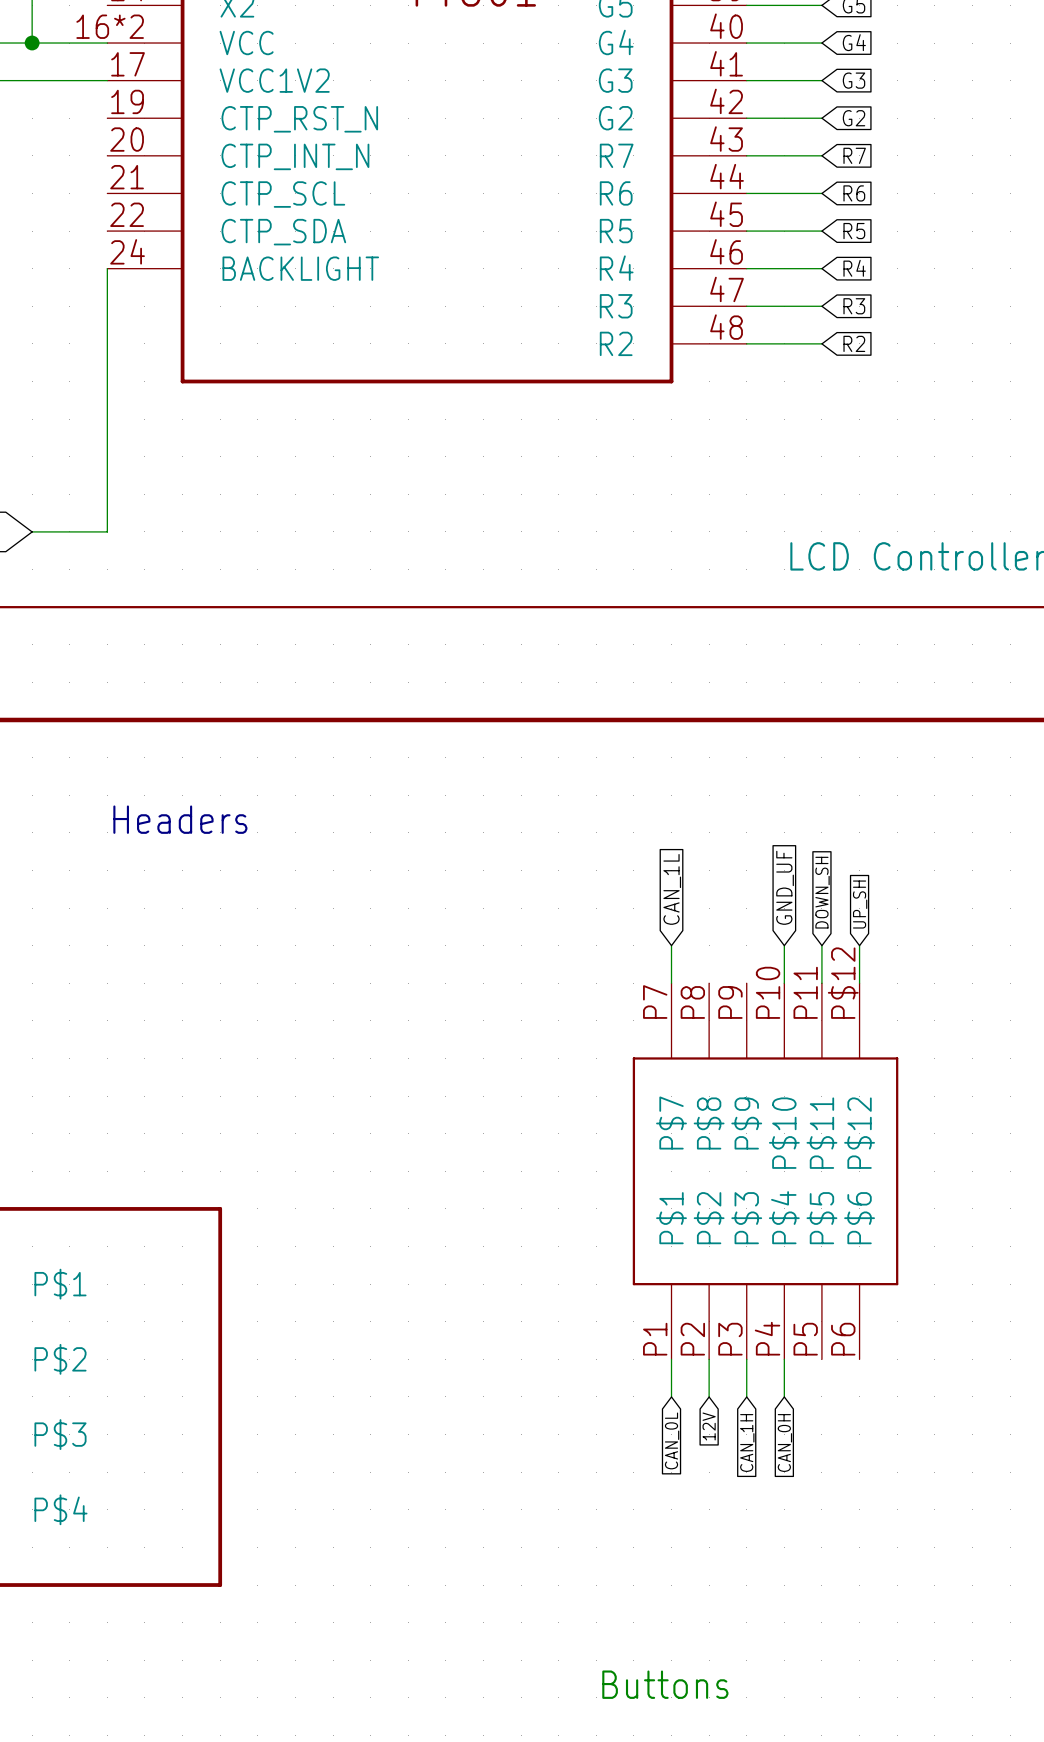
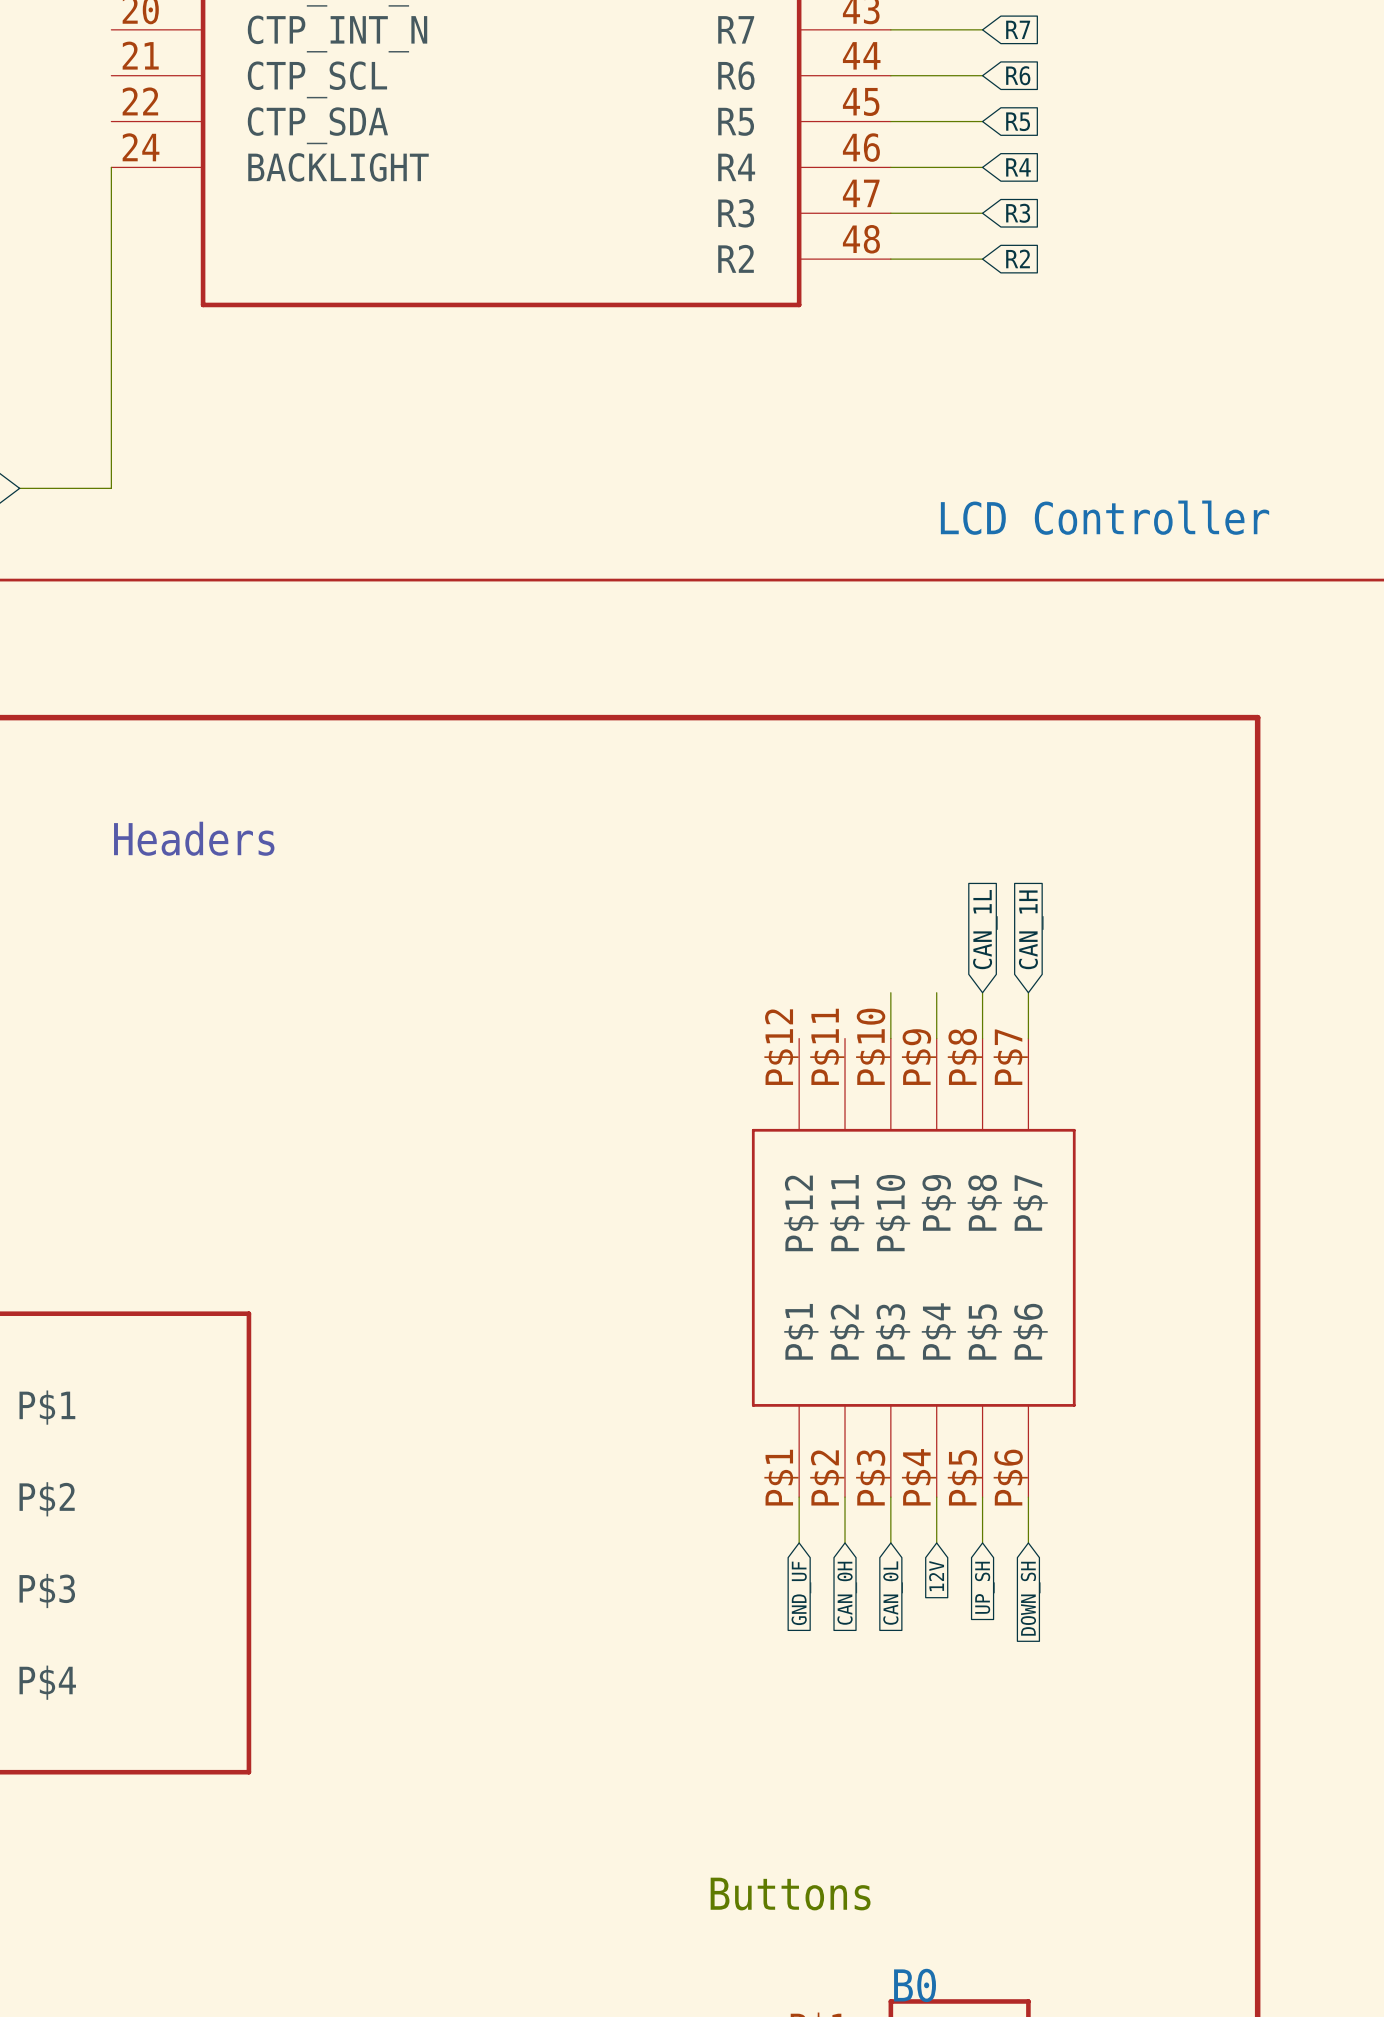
global label: GND_UF (785, 887) -> none
global label: CAN_1L (672, 889) -> none
global label: DOWN_SH (822, 892) -> CAN_1L (985, 929)
global label: UP_SH (860, 904) -> CAN_1H (1031, 929)
wire: (671, 945) (671, 983) -> (890, 992) (890, 1038)
part symbol: [632, 983, 899, 1360] -> [751, 1038, 1076, 1498]
wire: none -> (982, 1497) (982, 1542)
wire: none -> (1028, 1497) (1028, 1542)
global label: 12V (709, 1426) -> CAN_0H (847, 1593)
global label: none -> UP_SH (984, 1587)
global label: CAN_0L (672, 1440) -> GND_UF (801, 1593)
global label: CAN_1H (747, 1442) -> CAN_0L (893, 1593)
global label: CAN_0H (784, 1442) -> 12V (936, 1576)
global label: none -> DOWN_SH (1030, 1598)

